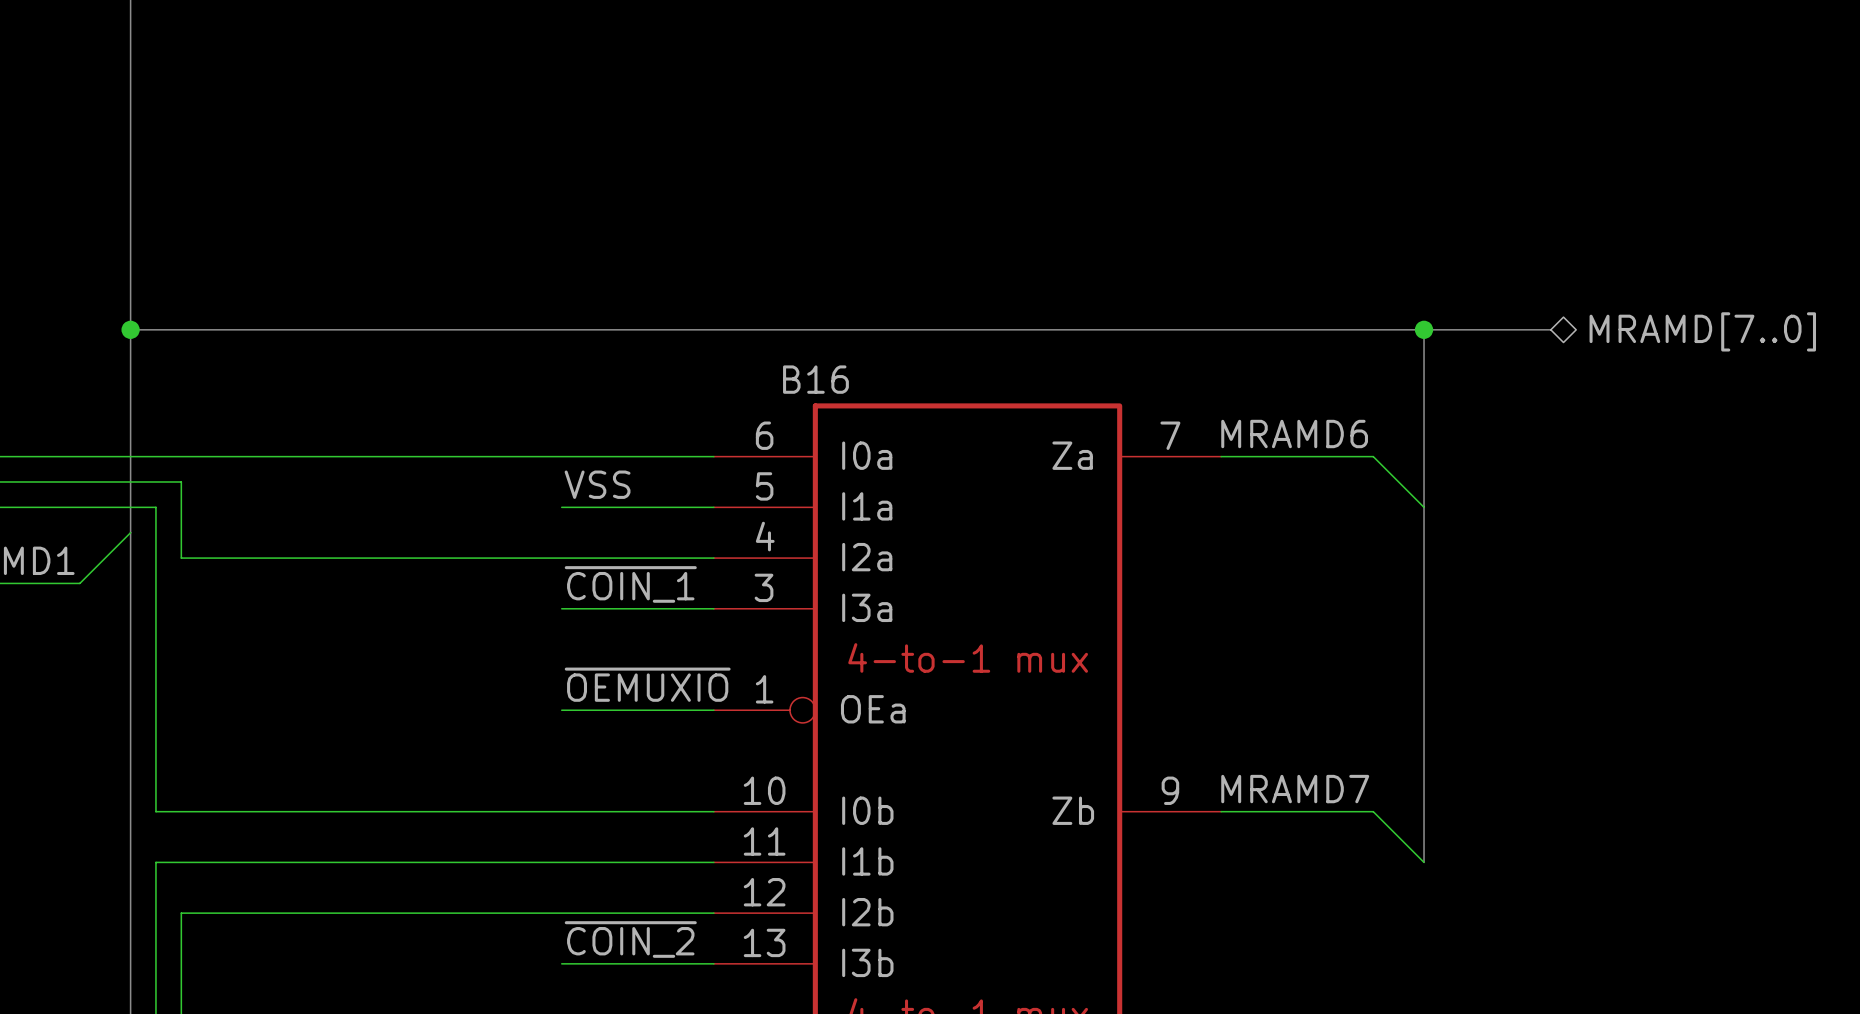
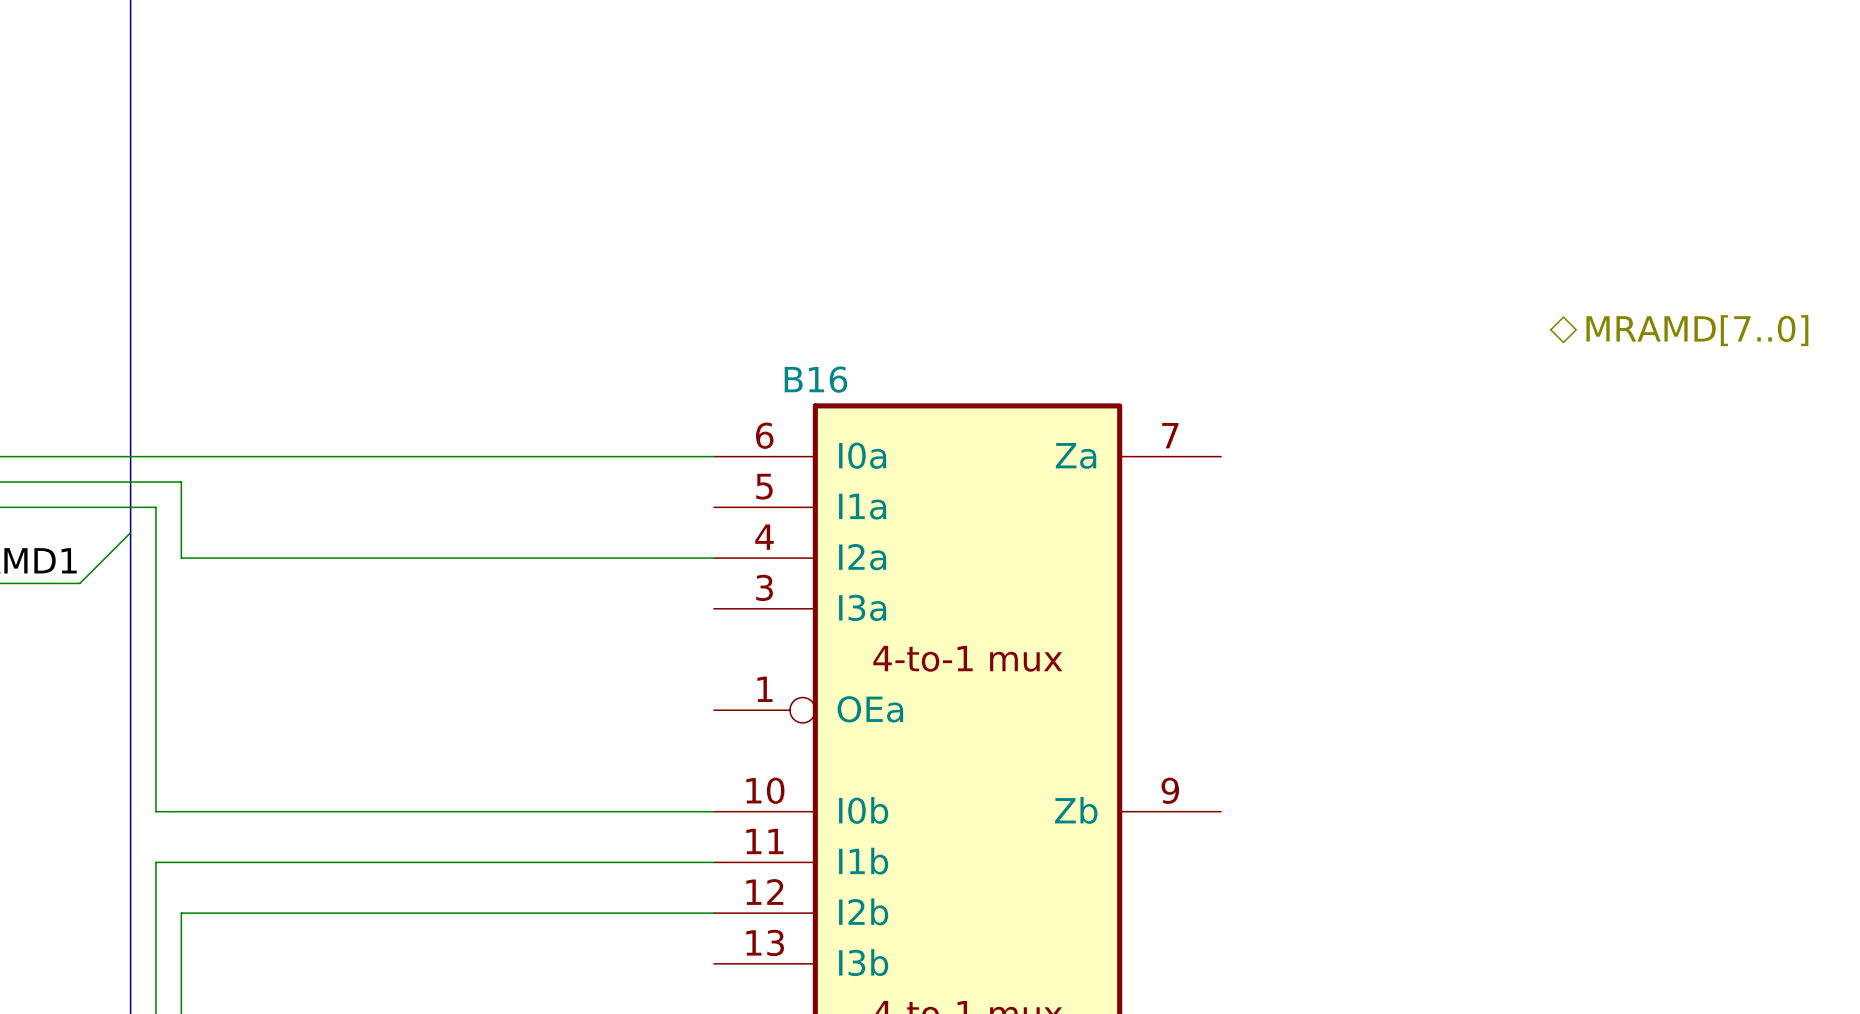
bus: (130, 329) (1550, 329) -> none
junction: (130, 329) -> none
bus: (1424, 329) (1424, 862) -> none
junction: (1424, 329) -> none
label: MRAMD6 (1294, 433) -> none
wire: (1221, 456) (1373, 456) (1424, 507) -> none
label: VSS (597, 484) -> none
wire: (561, 507) (713, 507) -> none
label: ~{COIN_1} (630, 584) -> none
wire: (561, 608) (713, 608) -> none
label: ~{OEMUXIO} (647, 684) -> none
wire: (561, 710) (713, 710) -> none
label: MRAMD7 (1295, 789) -> none
wire: (1221, 811) (1373, 811) (1424, 862) -> none
label: ~{COIN_2} (630, 939) -> none
wire: (561, 963) (713, 963) -> none

